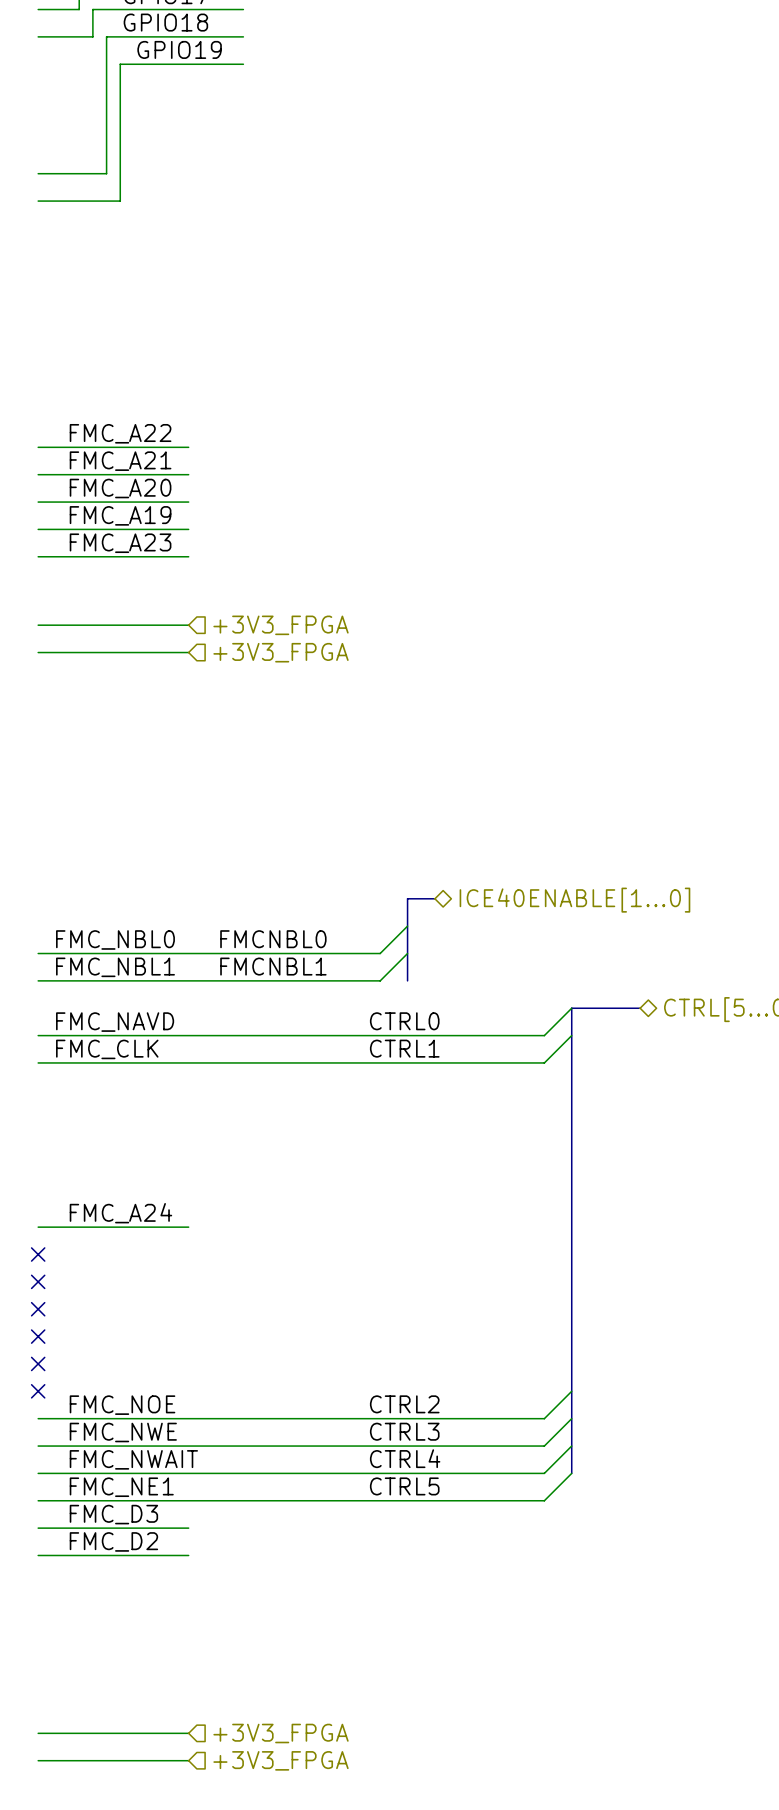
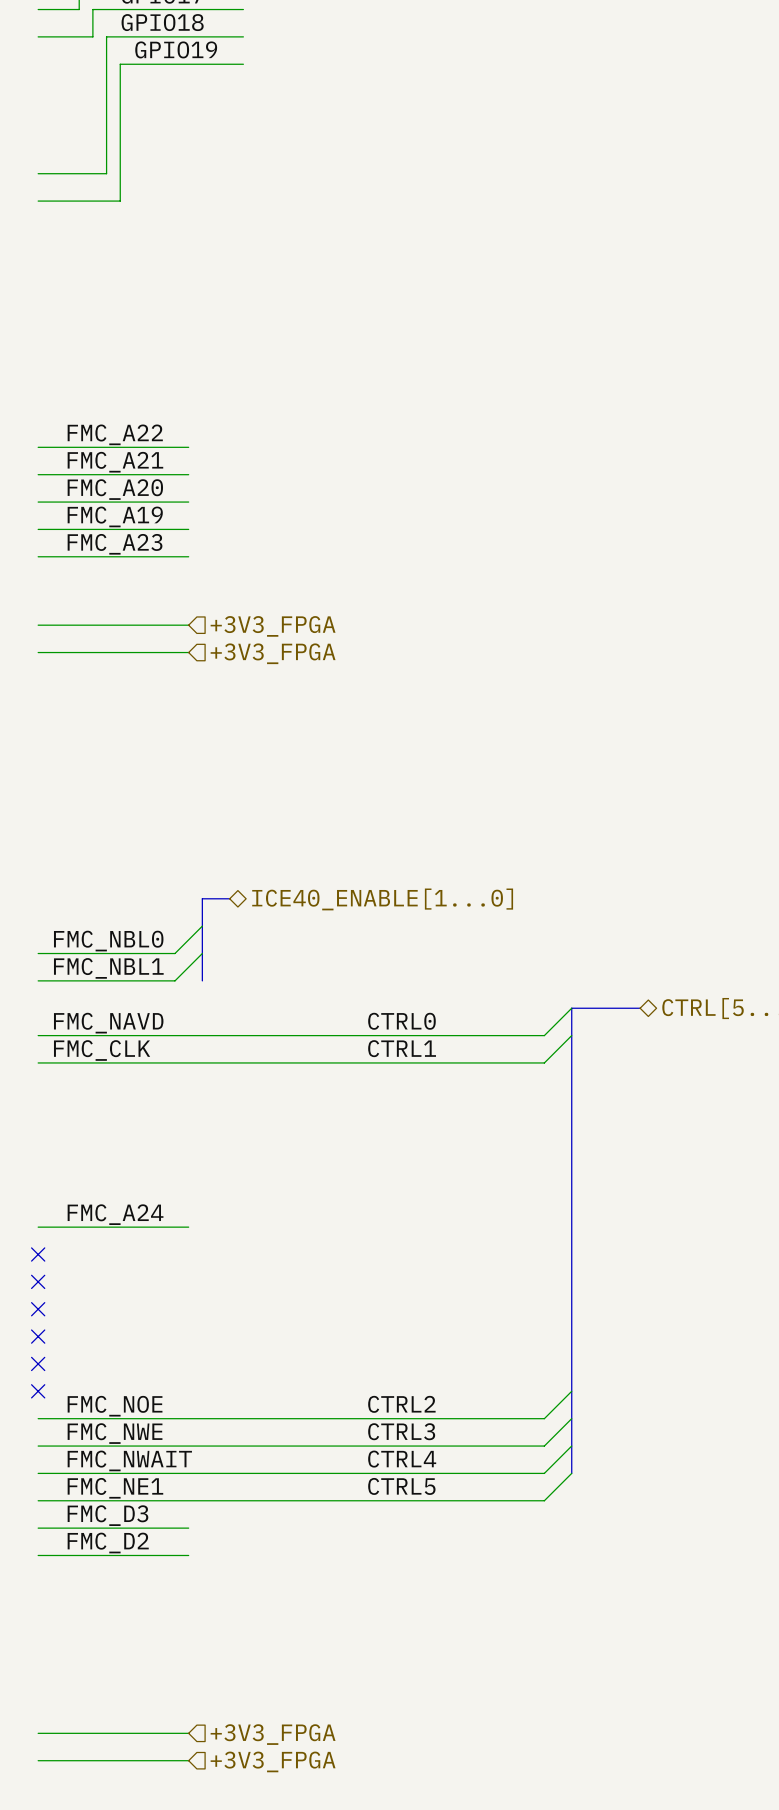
bus: (434, 898) (407, 898) (407, 980) -> (229, 898) (202, 898) (202, 980)
hierarchical label: ICE40ENABLE[1...0] (574, 900) -> ICE40_ENABLE[1...0] (382, 899)
wire: (407, 926) (380, 953) (174, 953) -> (202, 926) (174, 953)
label: FMCNBL0 (273, 939) -> none
wire: (407, 953) (380, 980) (174, 980) -> (202, 953) (174, 980)
label: FMCNBL1 (273, 966) -> none

